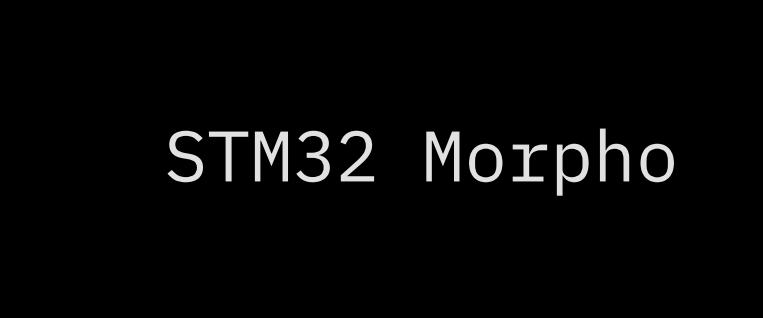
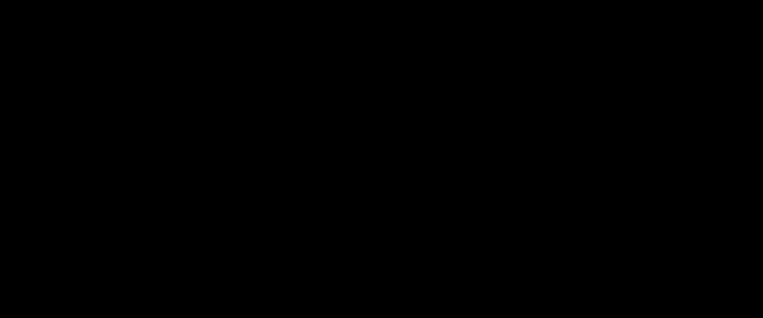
text: STM32 Morpho (420, 162) -> none

